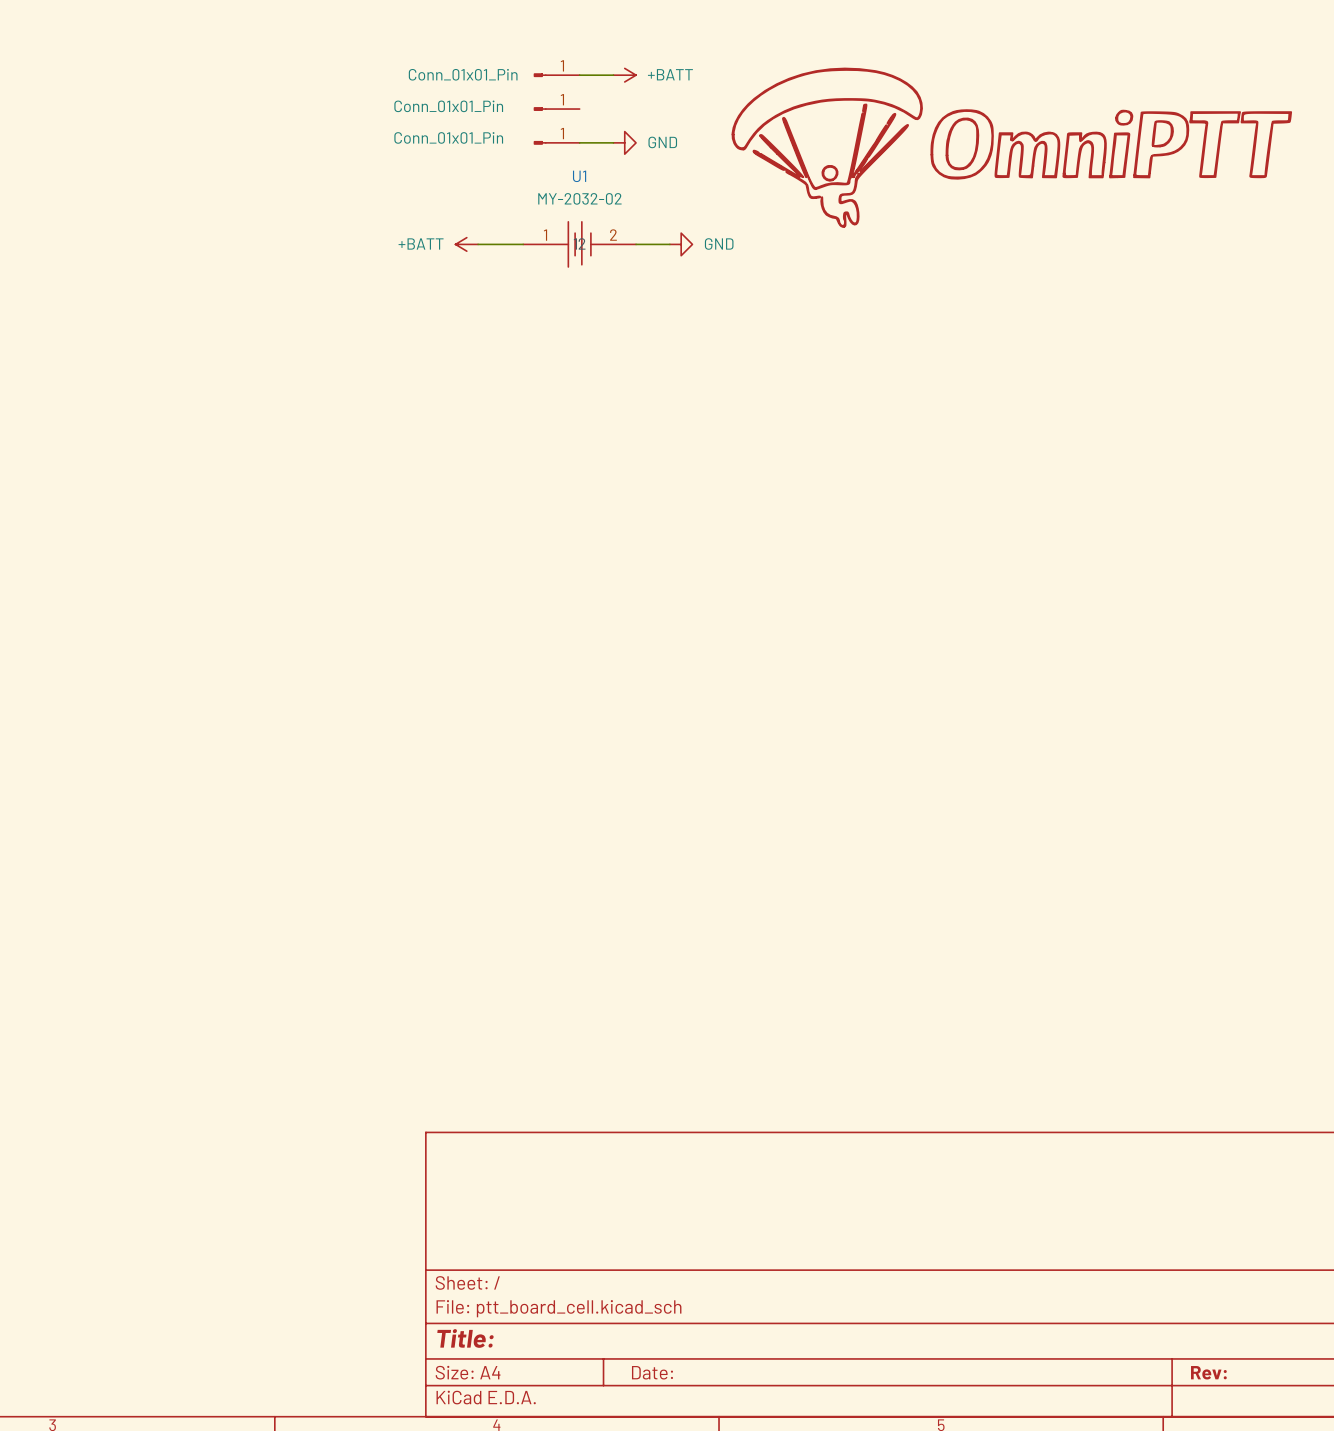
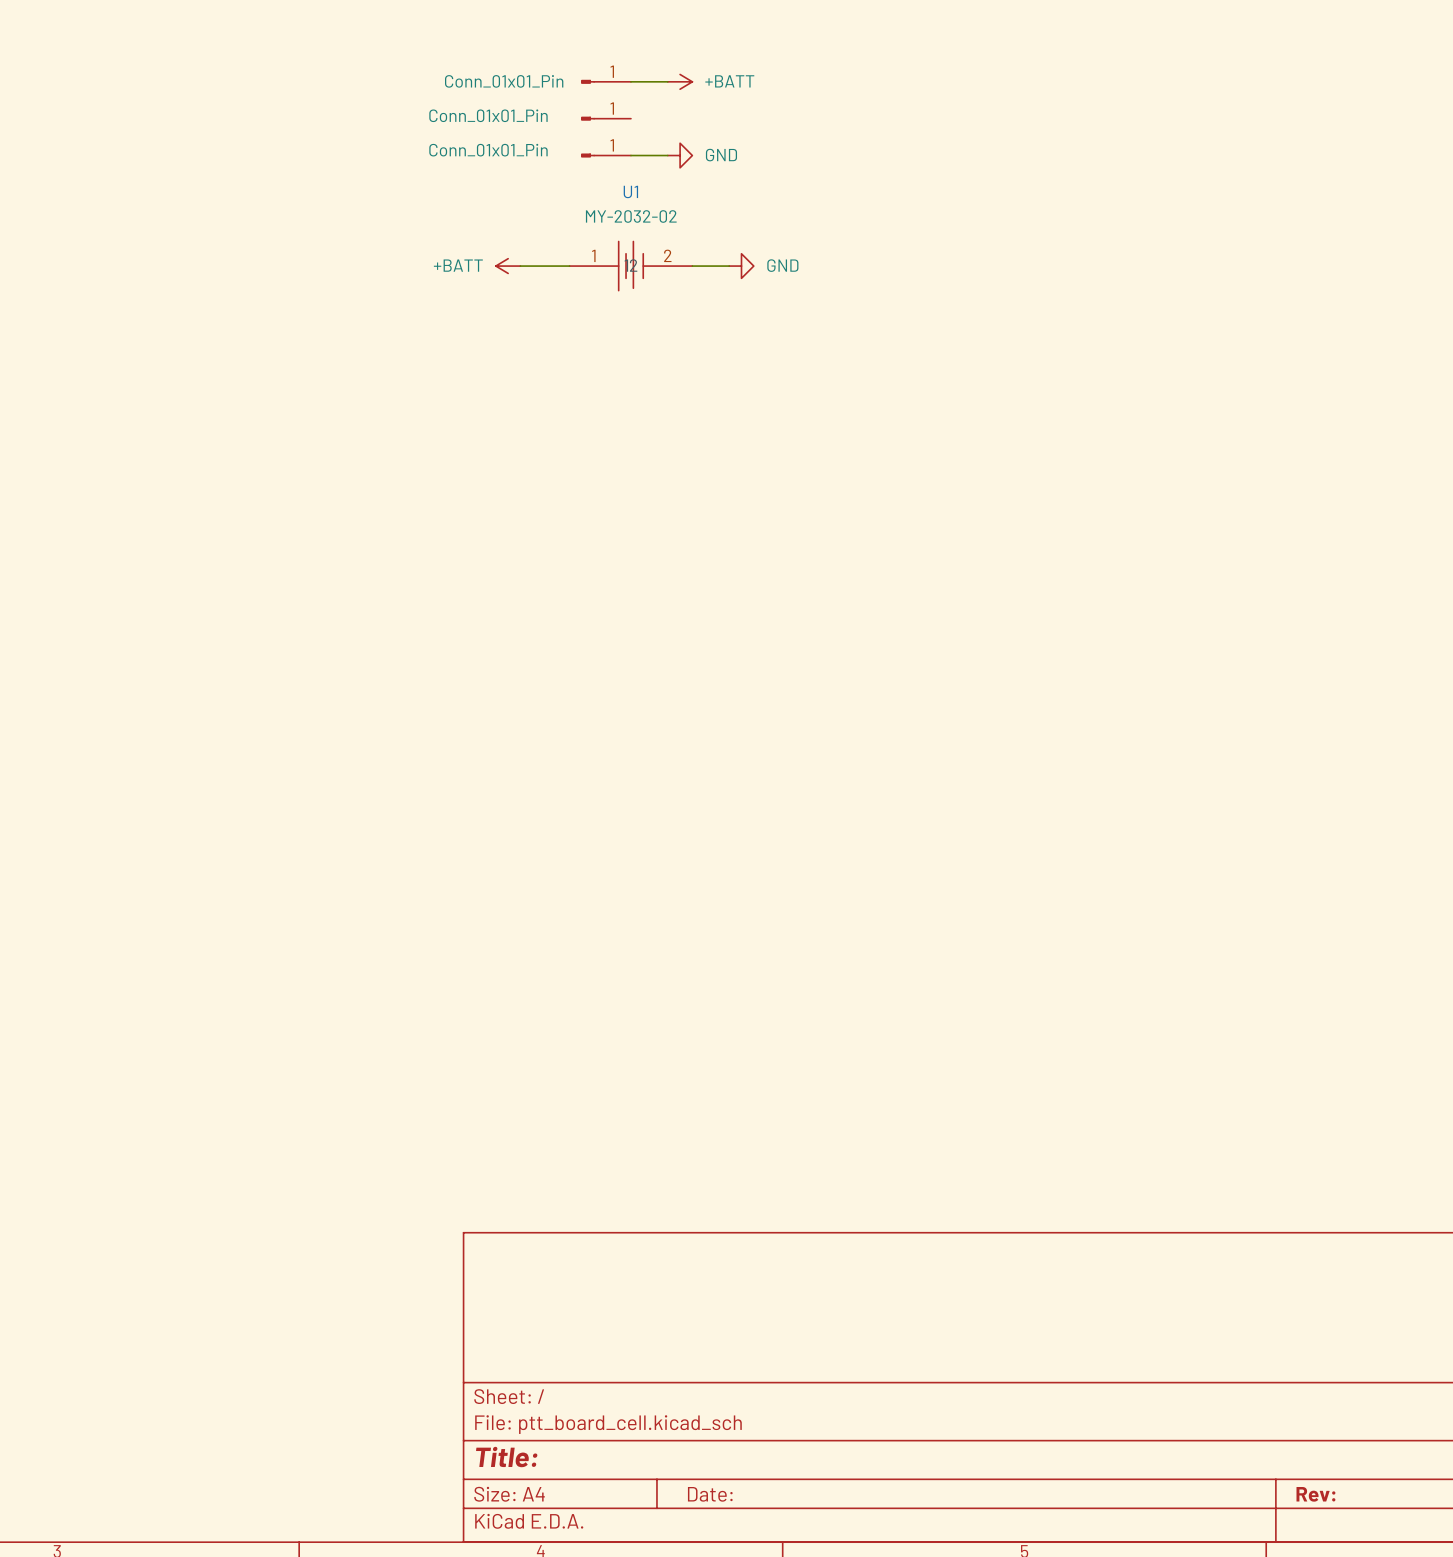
power symbol: (1011, 147) -> none

